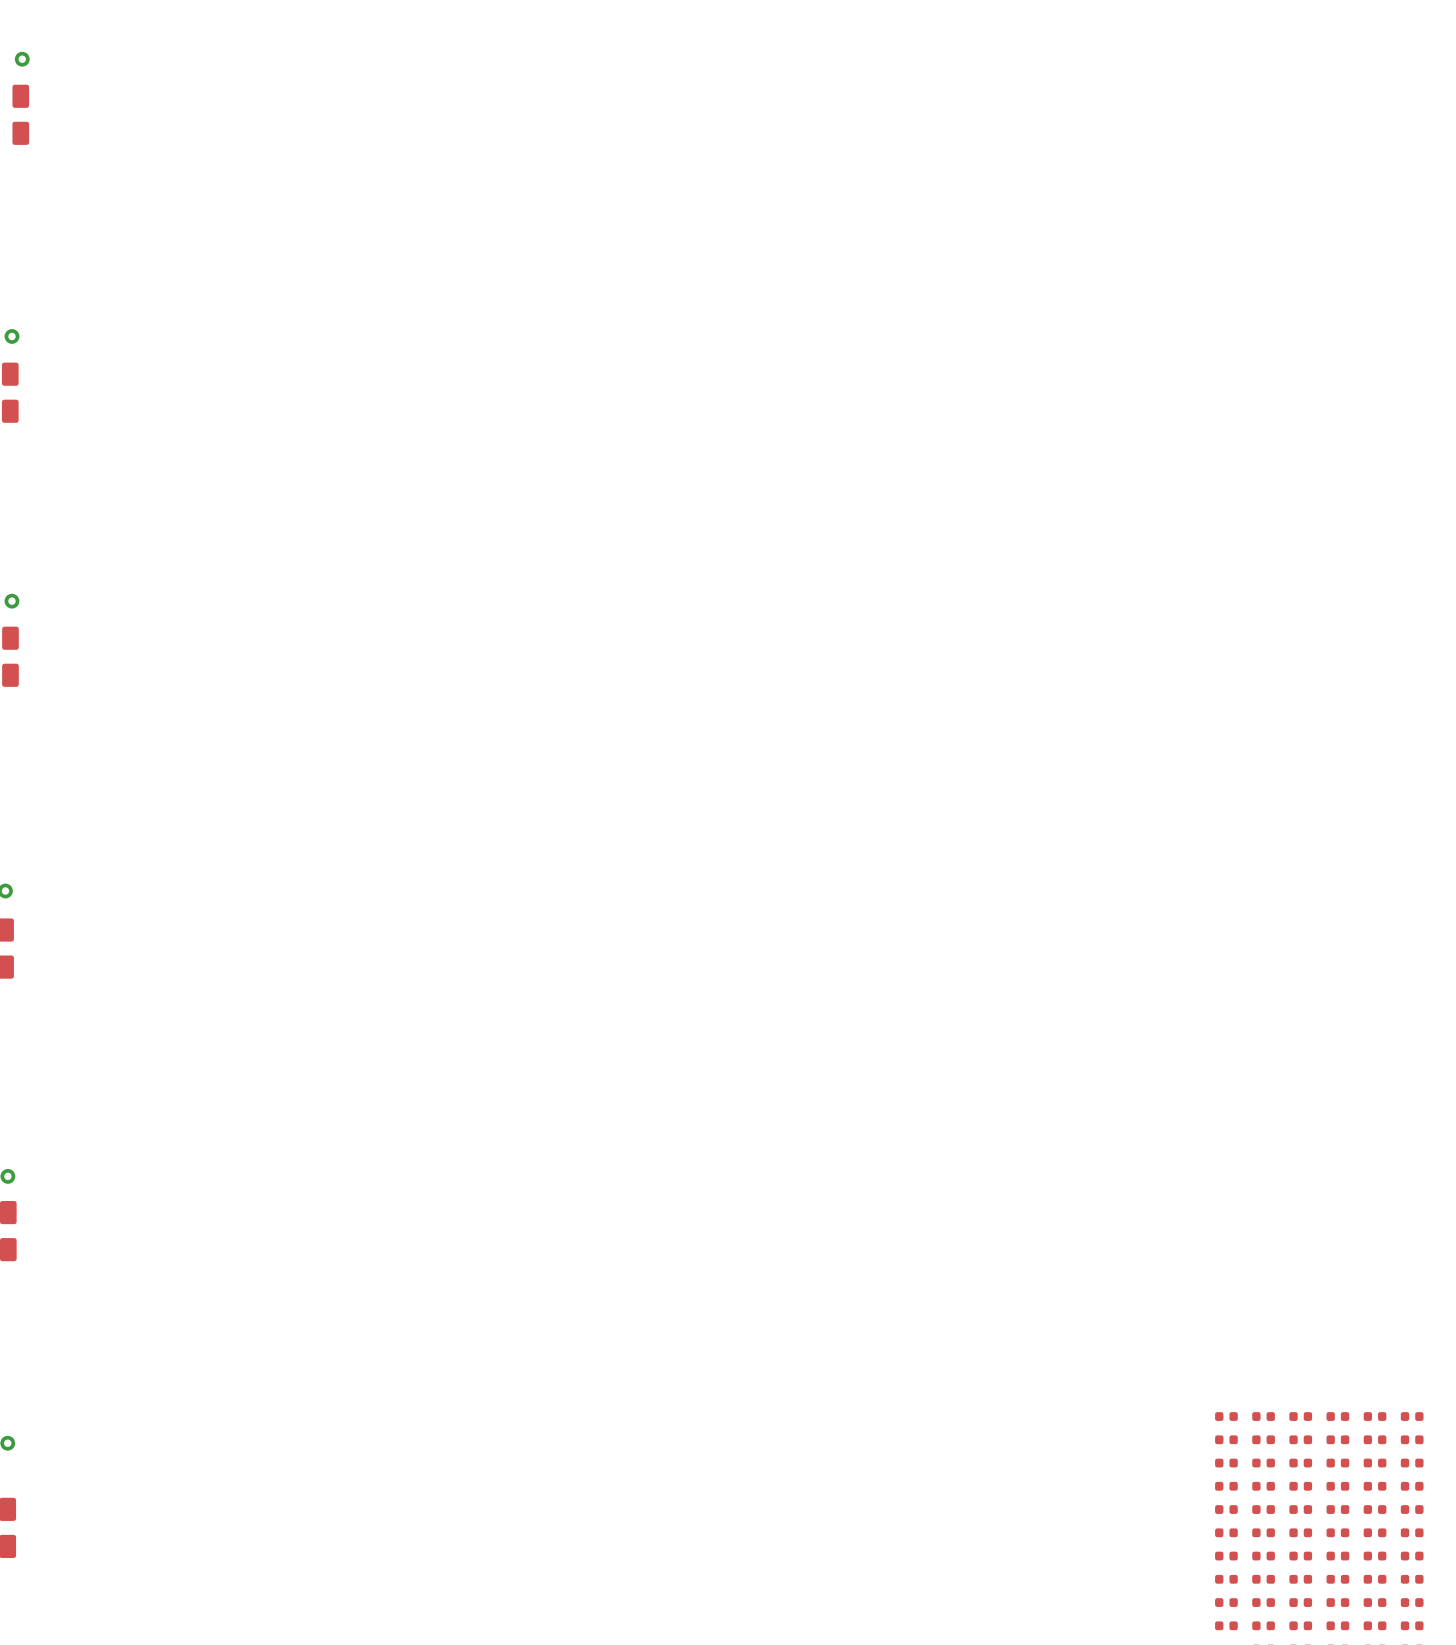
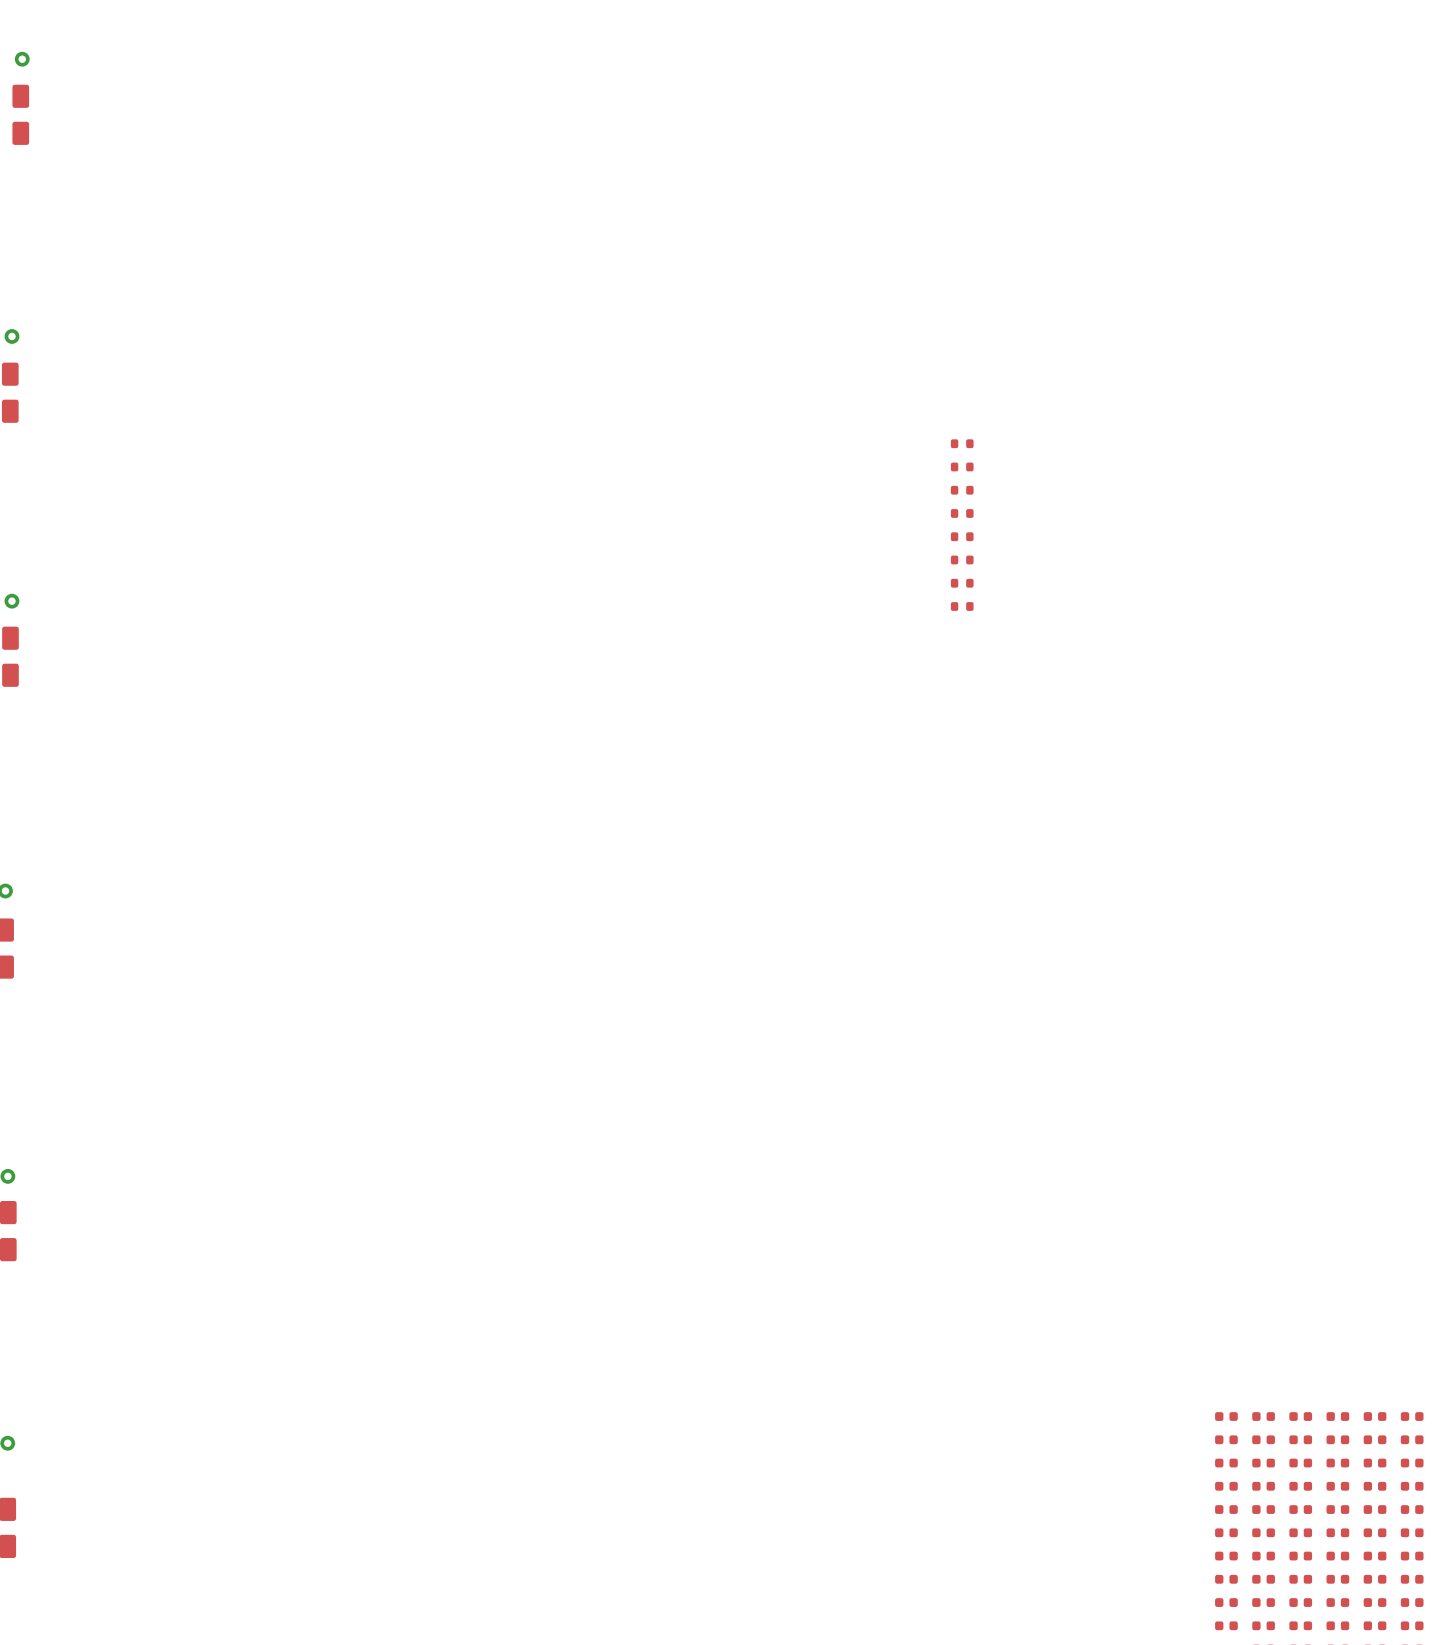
part: none -> (962, 443)
part: none -> (962, 466)
part: none -> (962, 490)
part: none -> (962, 513)
part: none -> (962, 536)
part: none -> (962, 559)
part: none -> (962, 583)
part: none -> (962, 606)

